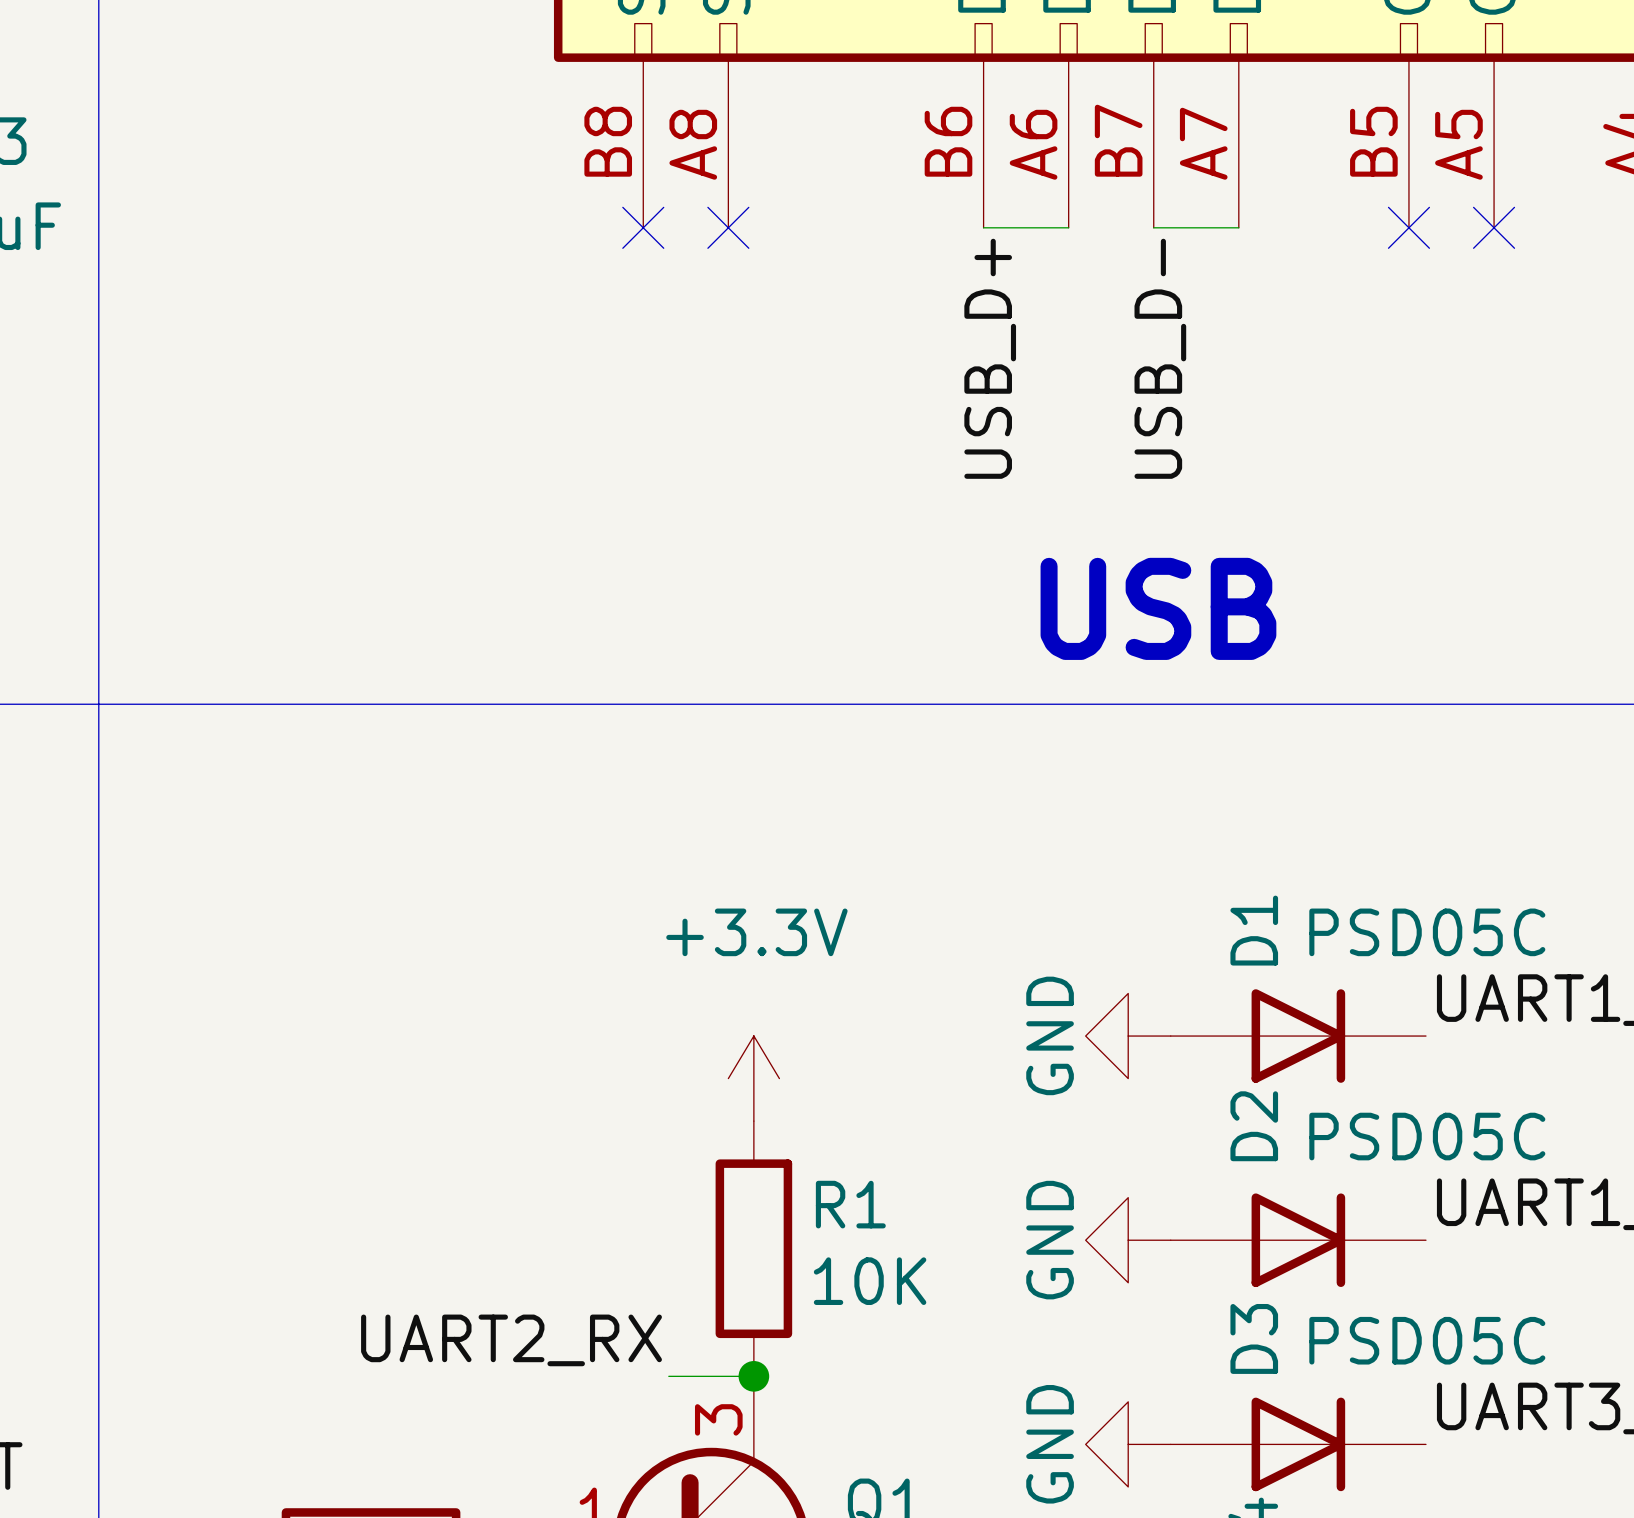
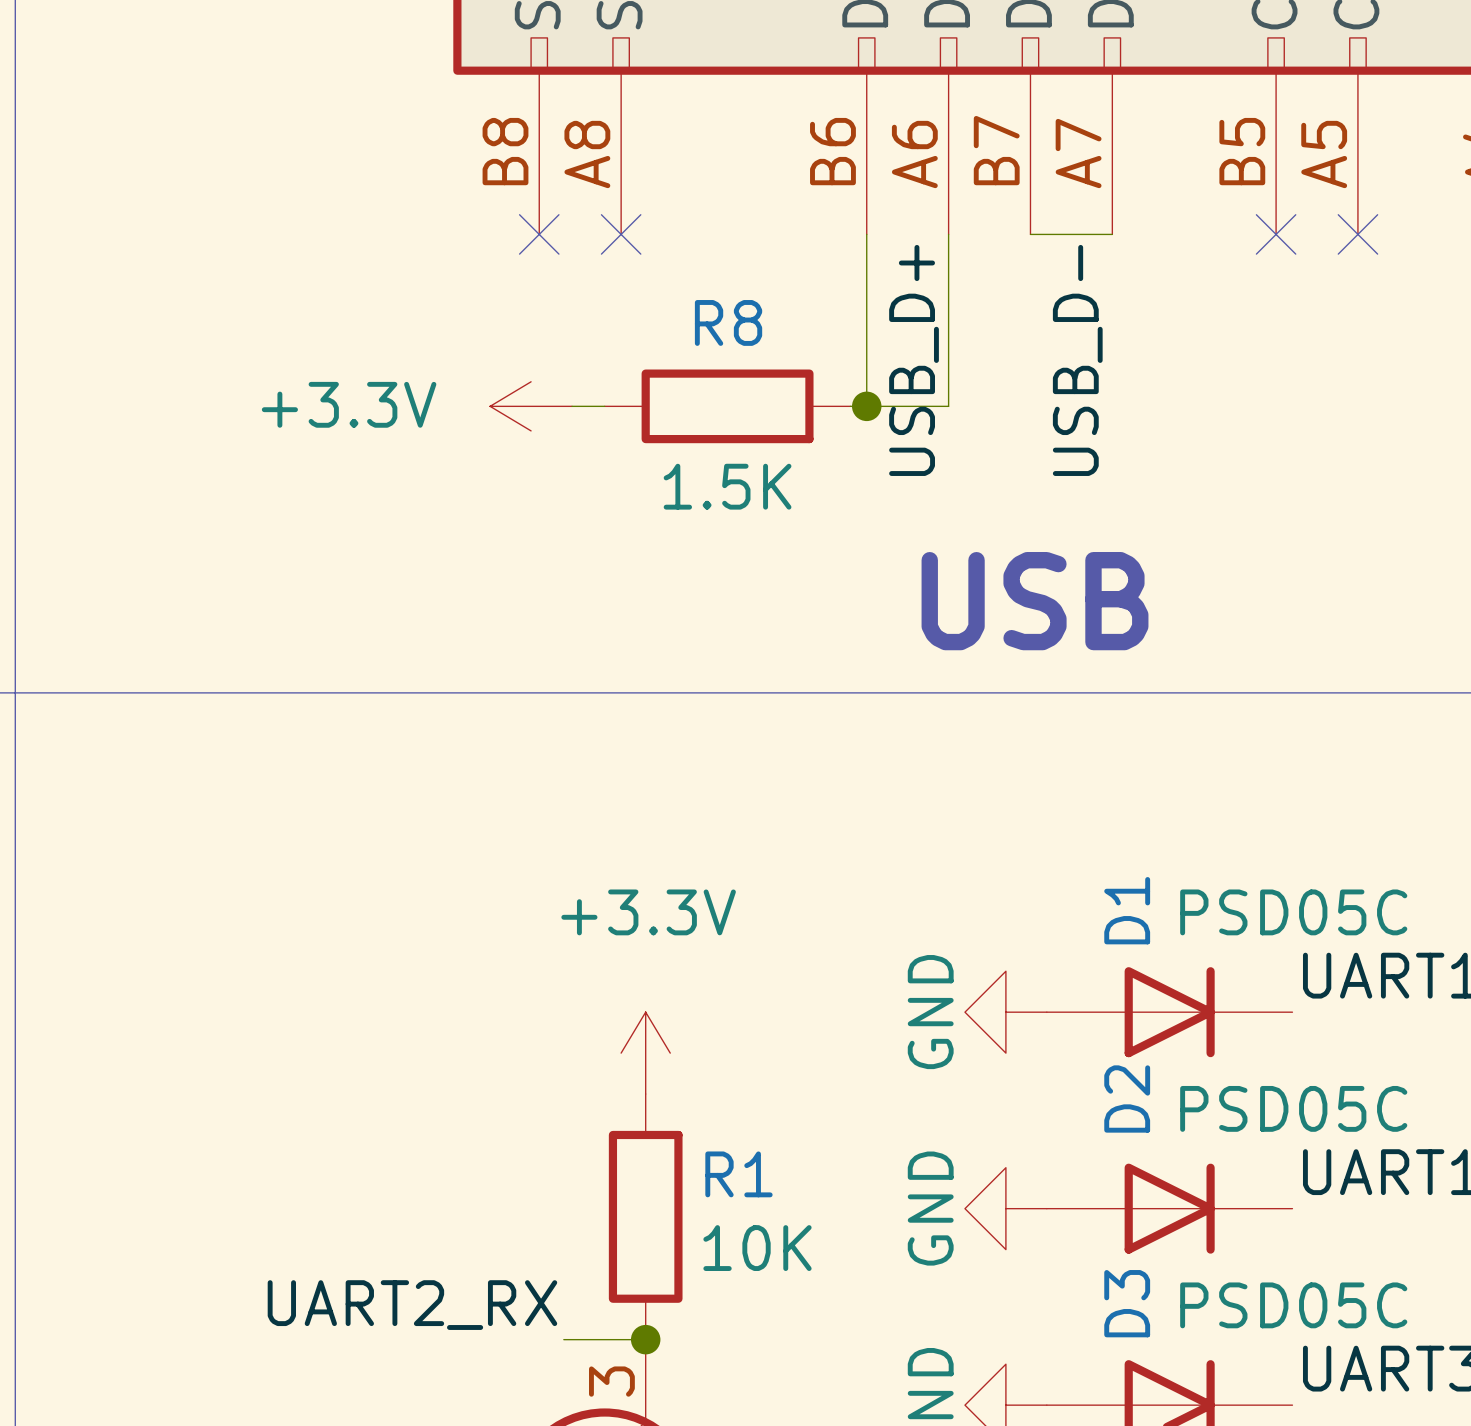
wire: (983, 227) (1068, 227) -> (850, 406) (948, 406) (948, 234)
wire: none -> (866, 234) (866, 406)
label position: USB_D+ (990, 358) -> USB_D+ (914, 360)
label position: USB_D- (1160, 358) -> USB_D- (1077, 360)
power symbol: none -> +3.3V (531, 406)
wire: none -> (572, 406) (604, 406)
R8: none -> 1.5K (727, 406)
junction: none -> (866, 406)

